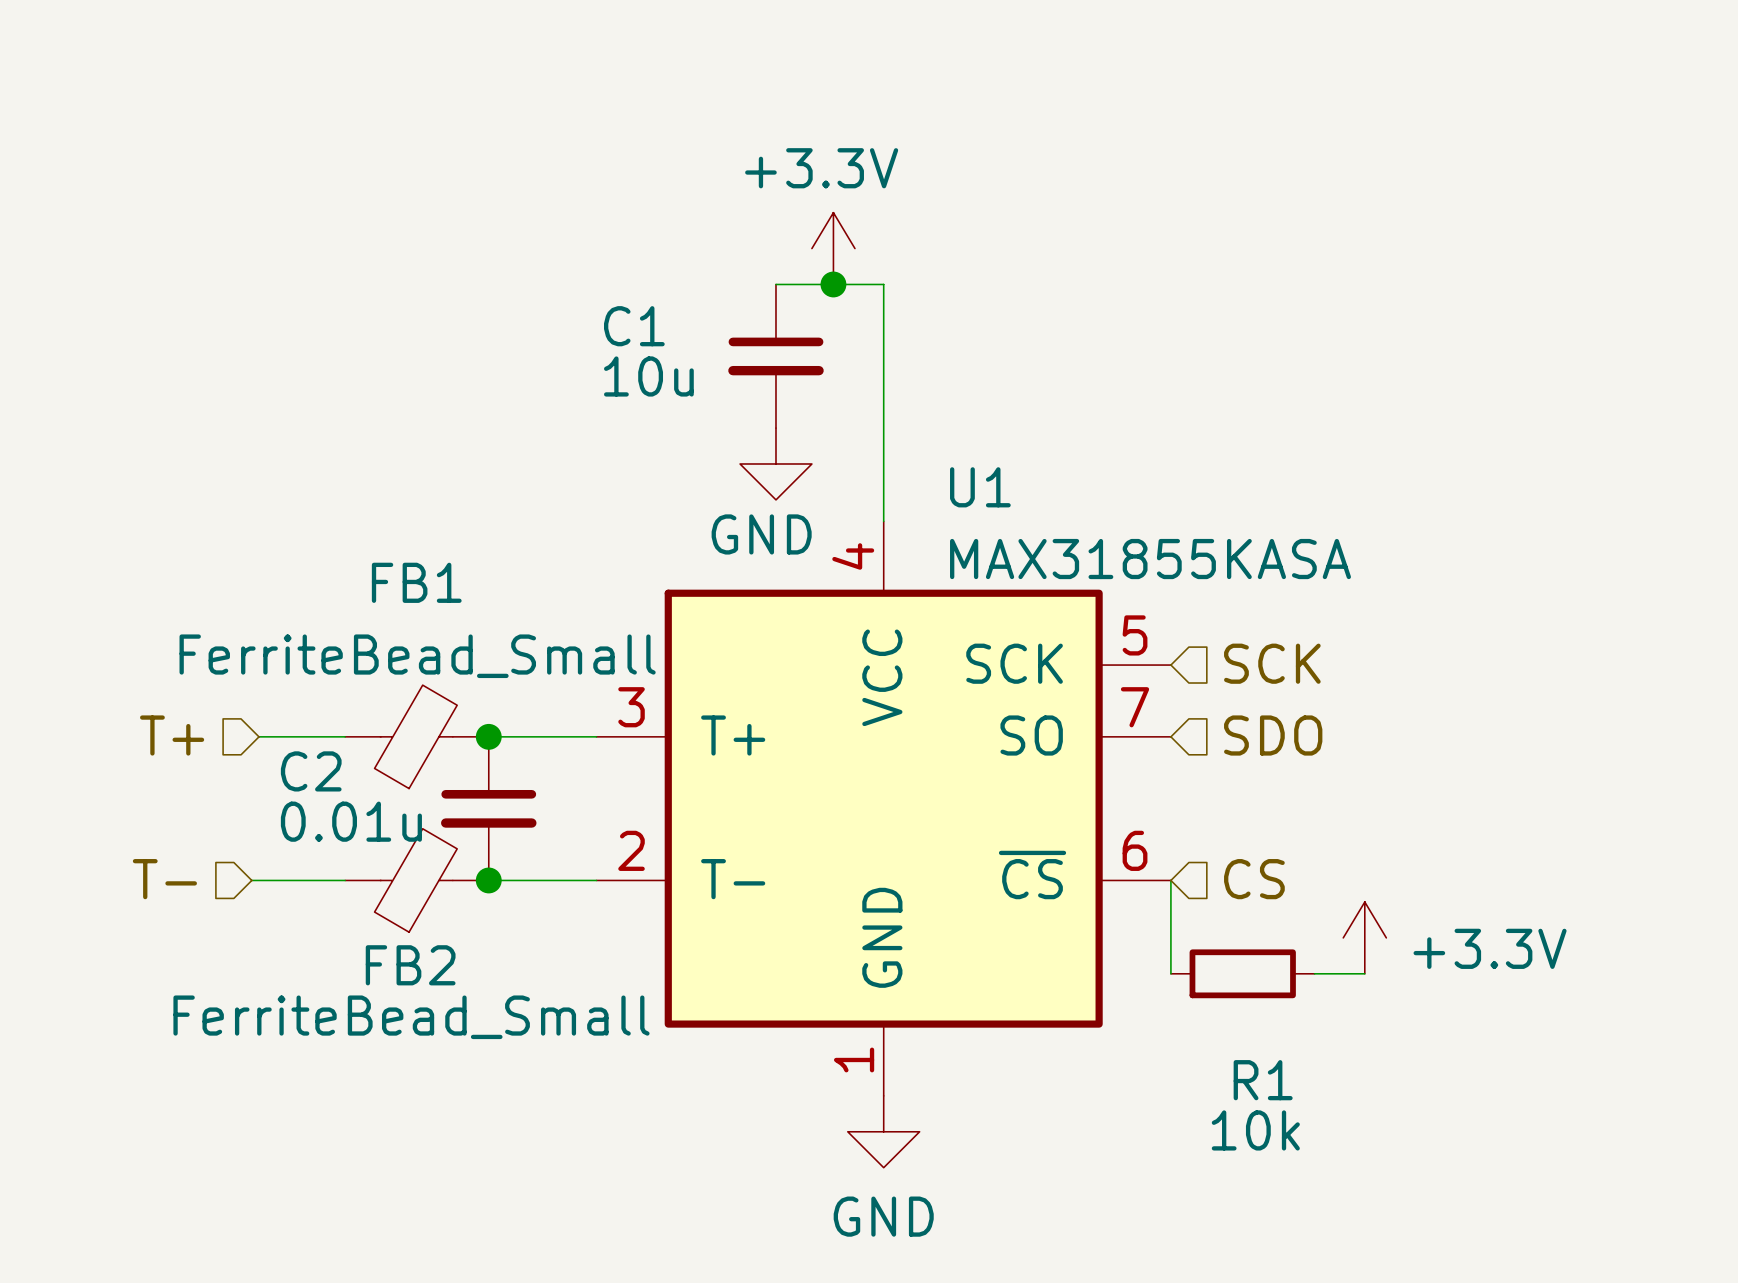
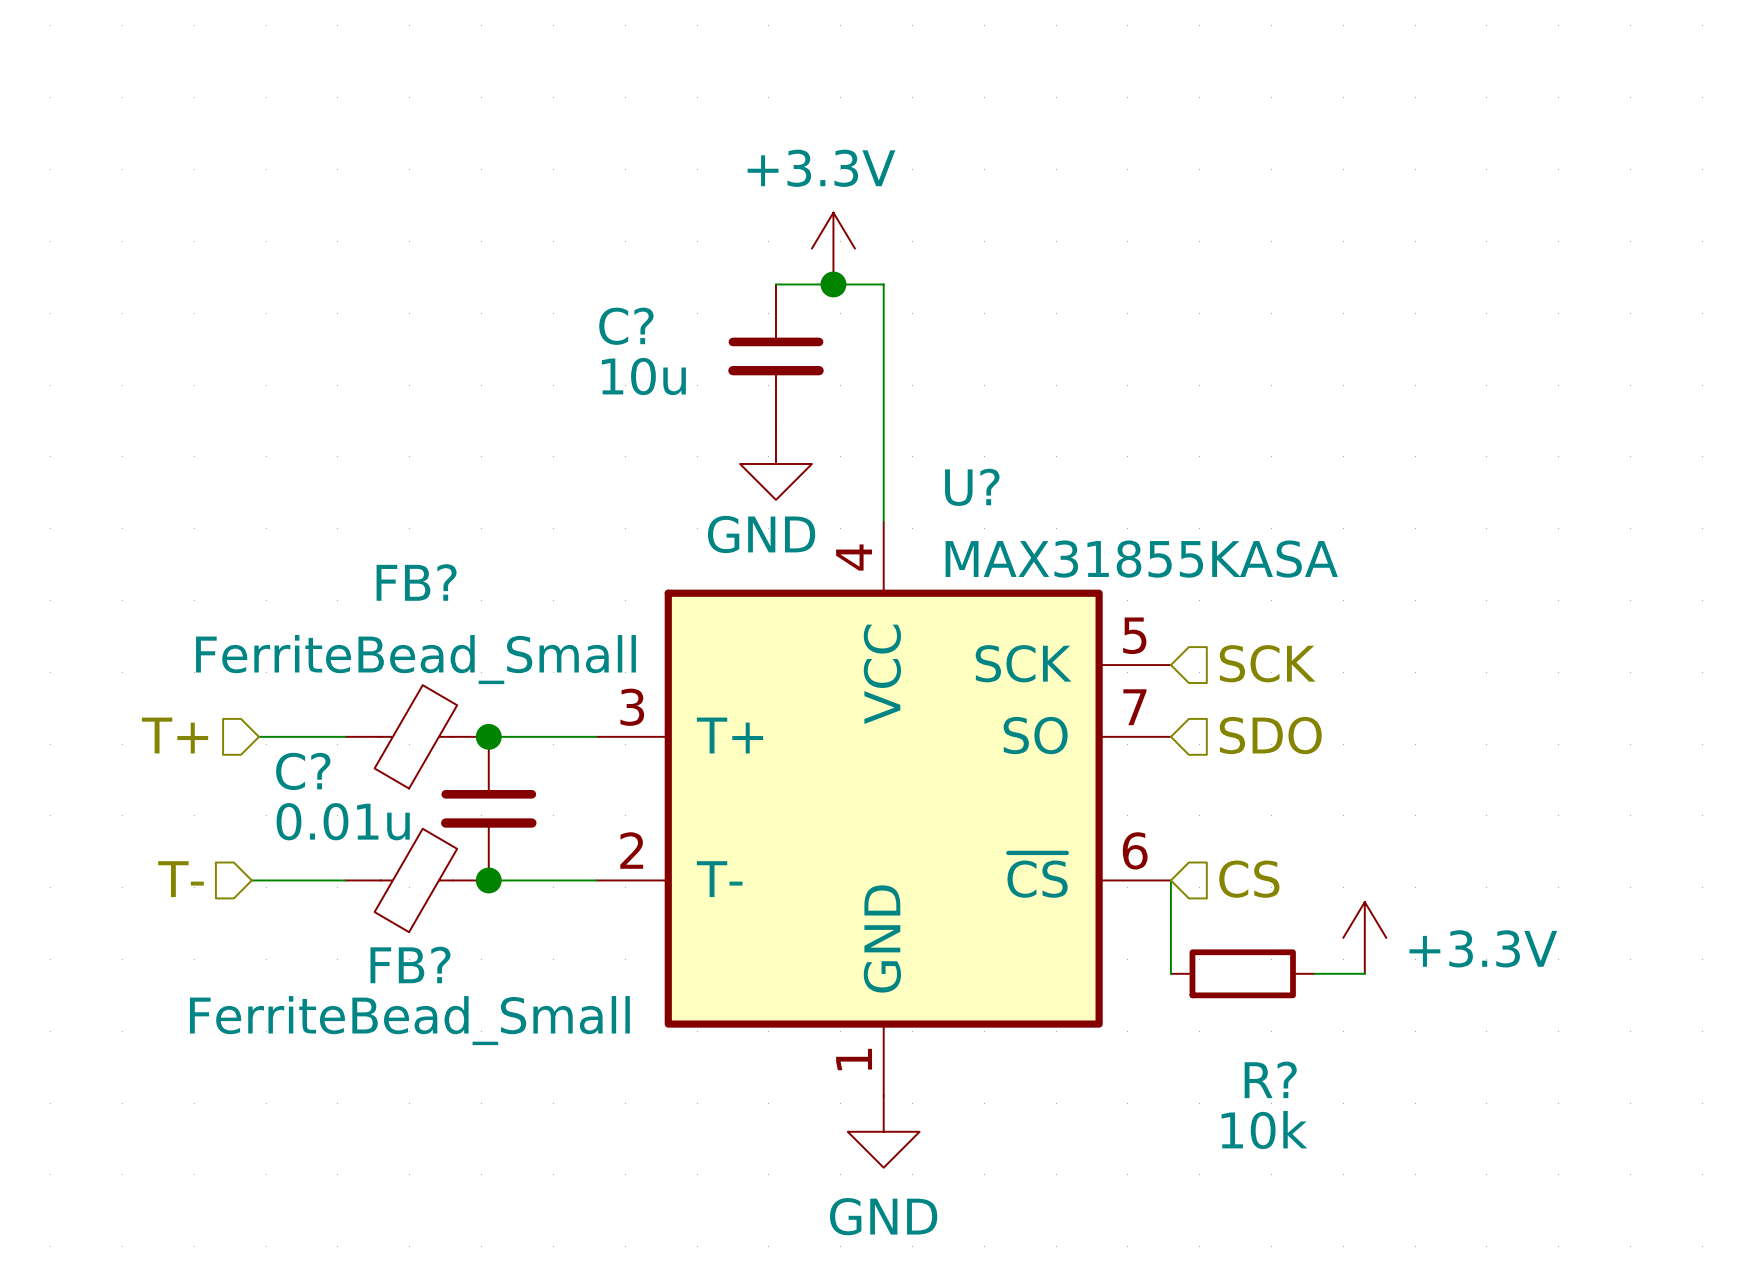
C1 name: C1 (634, 326) -> C? (626, 326)
U1 name: U1 (980, 487) -> U? (972, 487)
FB1 name: FB1 (416, 582) -> FB? (416, 582)
C2 name: C2 (311, 771) -> C? (303, 771)
FB2 name: FB2 (410, 965) -> FB? (410, 964)
R1 name: R1 (1263, 1080) -> R? (1270, 1079)

